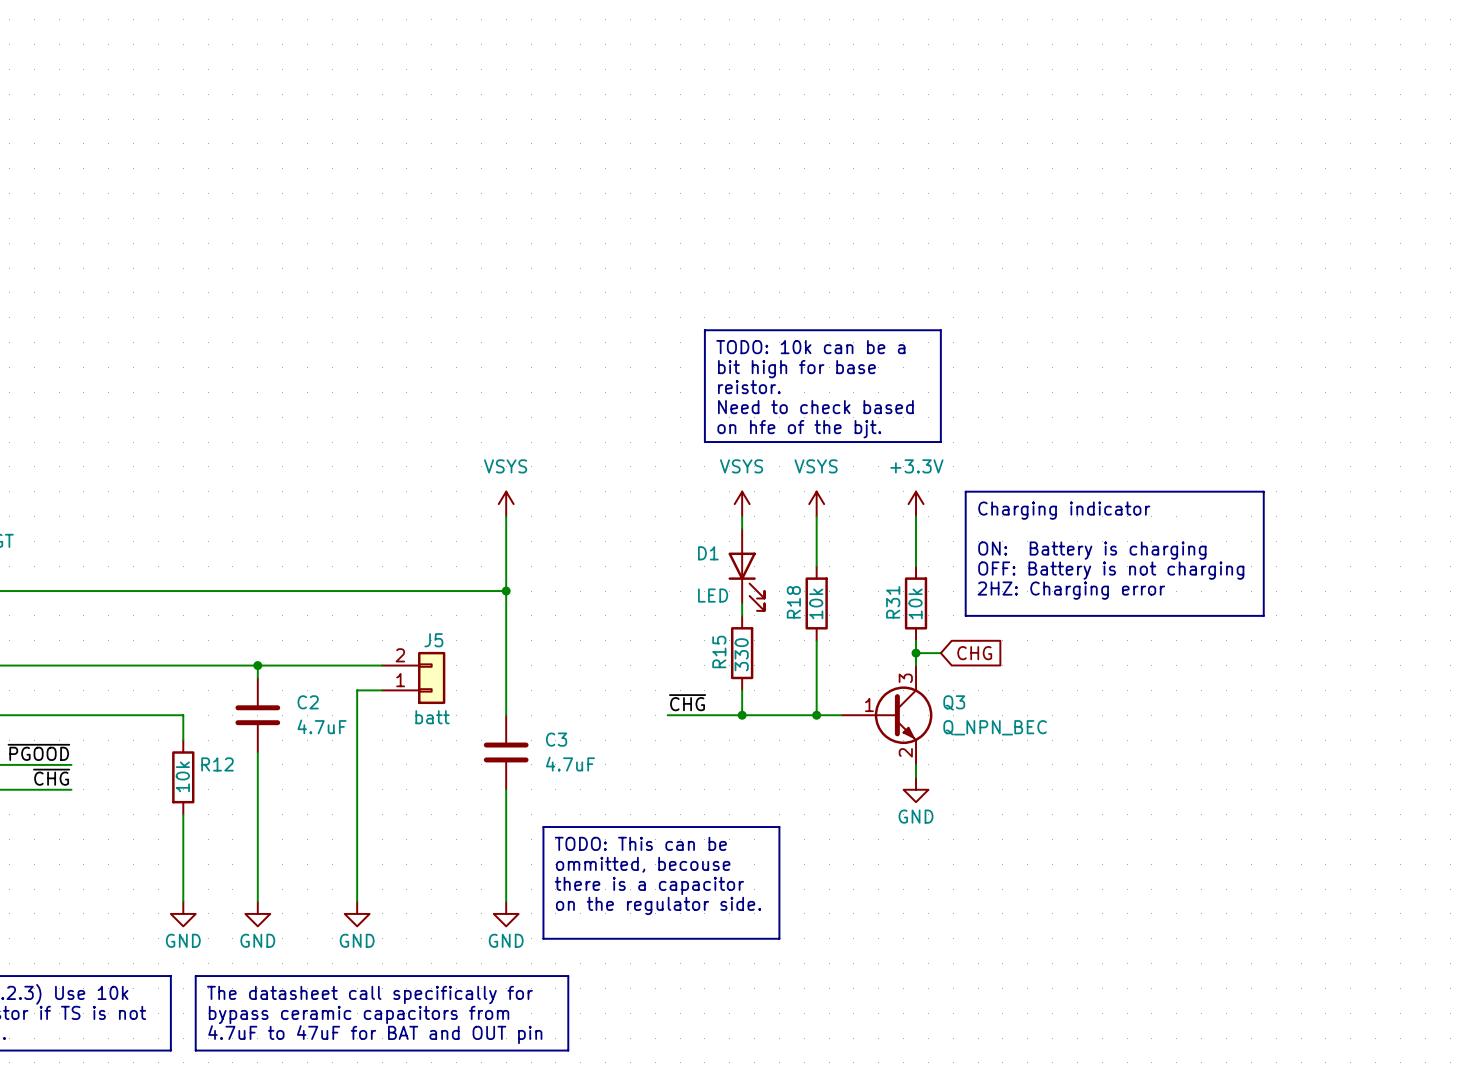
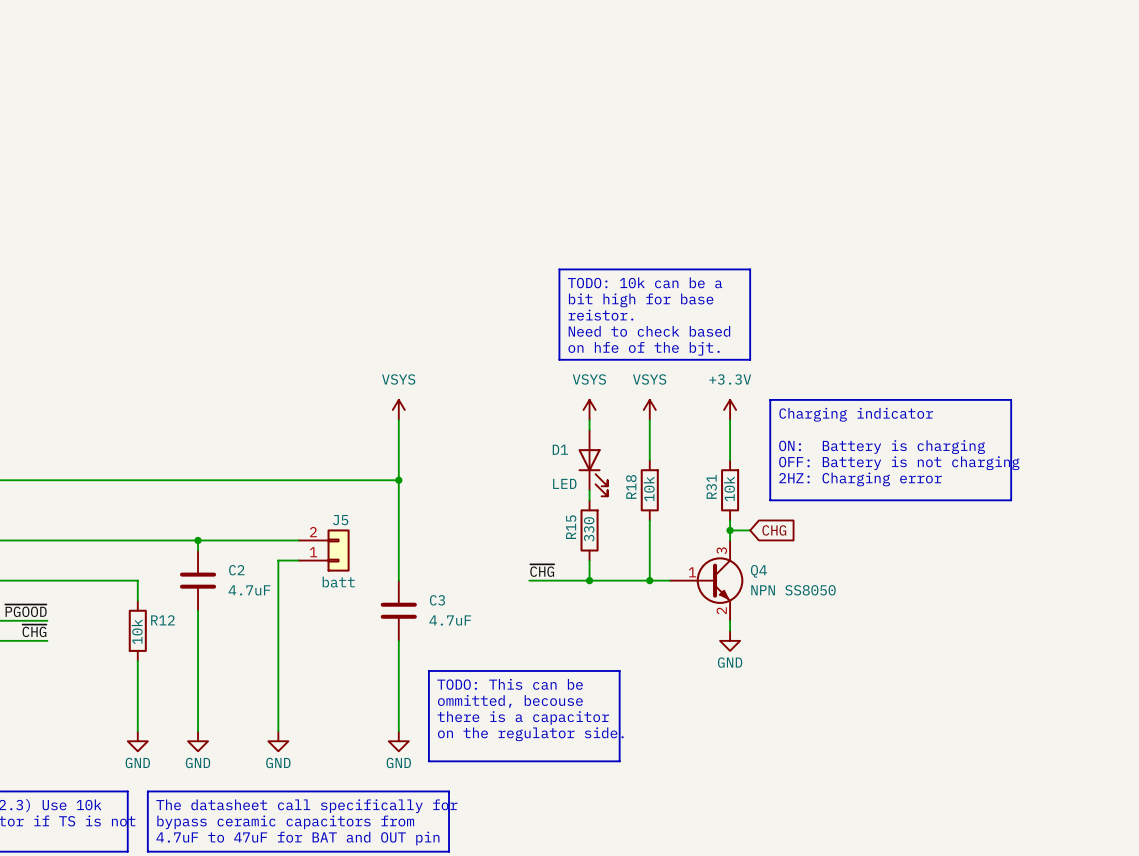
Q3 name: Q3 (954, 702) -> Q4 (758, 571)
Q3 value: Q_NPN_BEC (995, 727) -> NPN SS8050 (793, 590)

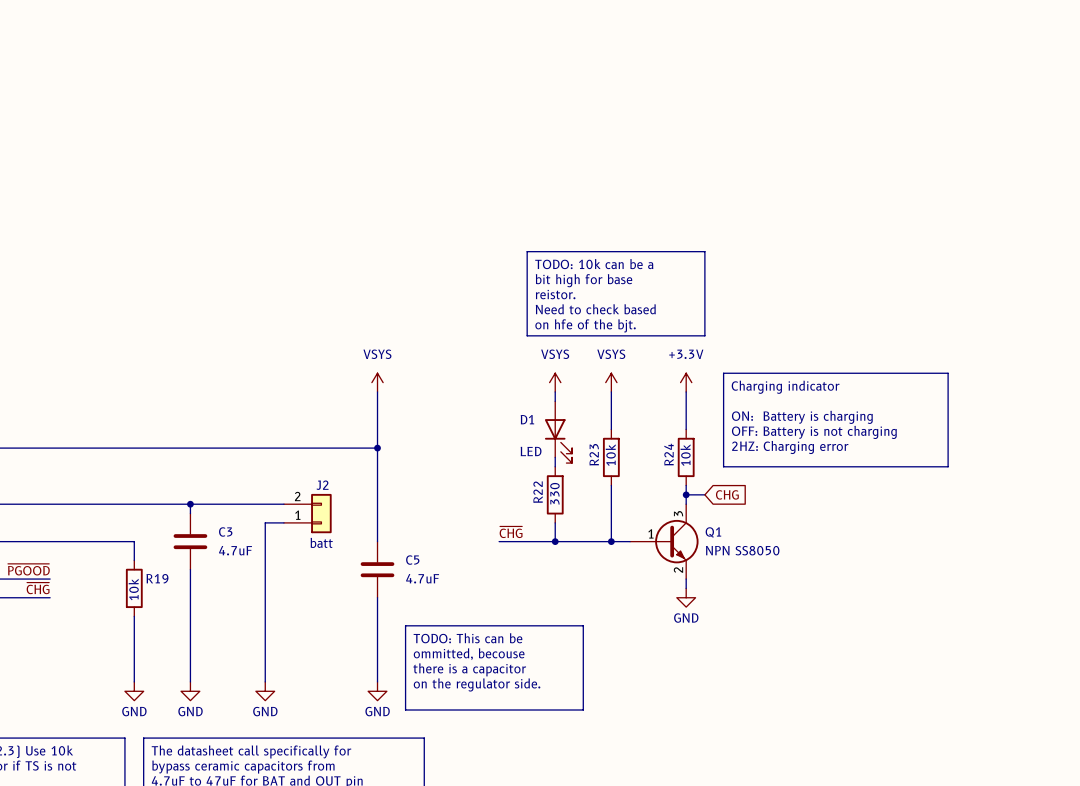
R18 name: R18 (631, 486) -> R23 (594, 454)
R31 name: R31 (711, 486) -> R24 (669, 454)
J5 name: J5 (340, 520) -> J2 (322, 485)
R15 name: R15 (571, 527) -> R22 (538, 492)
C2 name: C2 (236, 570) -> C3 (225, 531)
Q4 name: Q4 (758, 571) -> Q1 (713, 532)
C3 name: C3 (437, 600) -> C5 (412, 560)
R12 name: R12 (162, 620) -> R19 (157, 578)

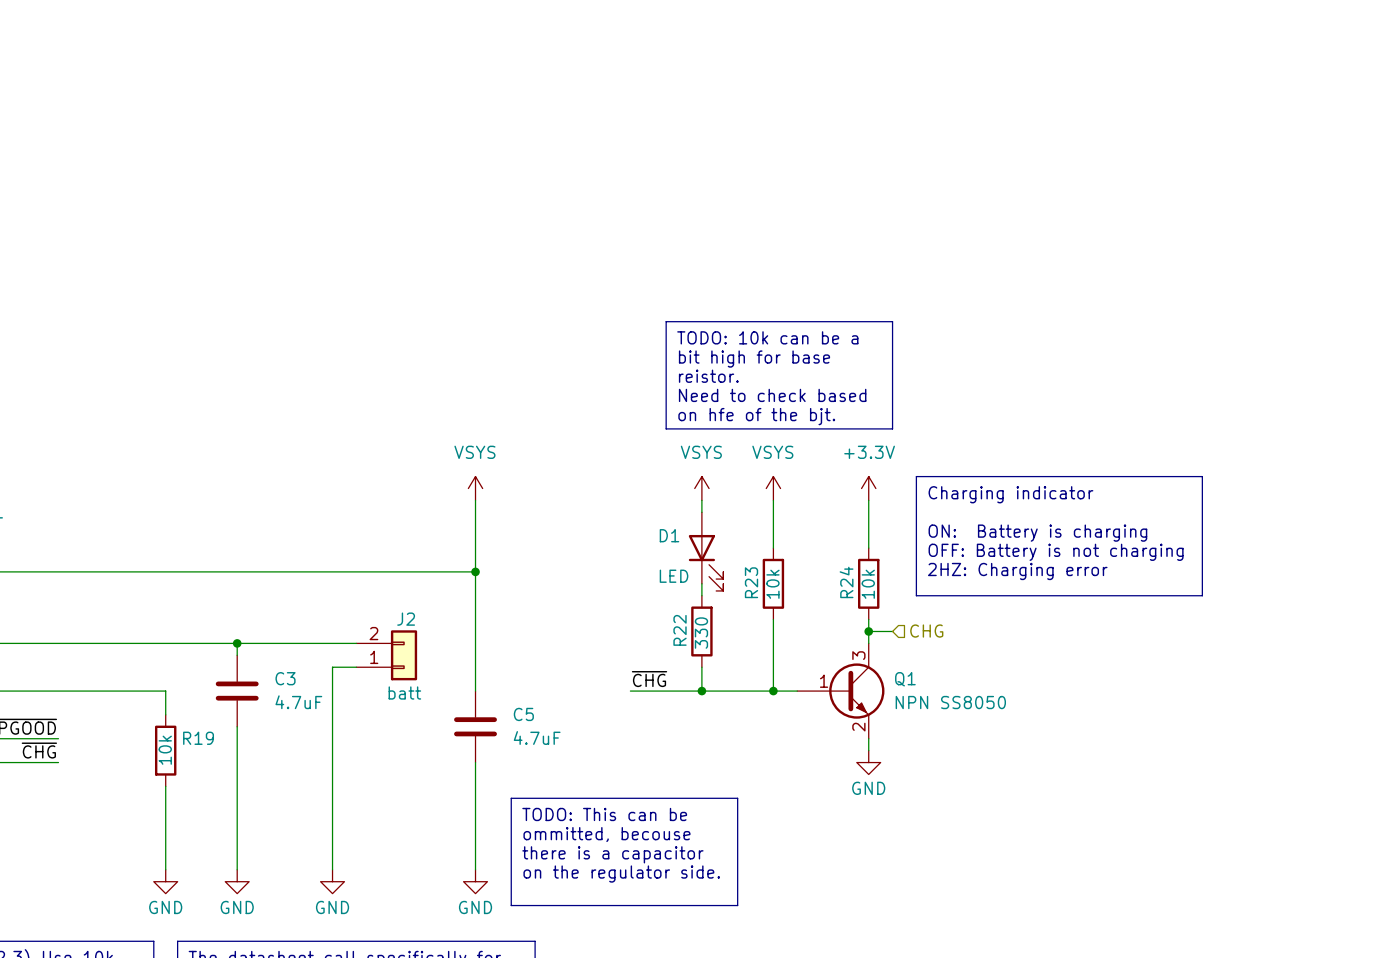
global label: CHG (727, 494) -> none
hierarchical label: none -> CHG (926, 631)

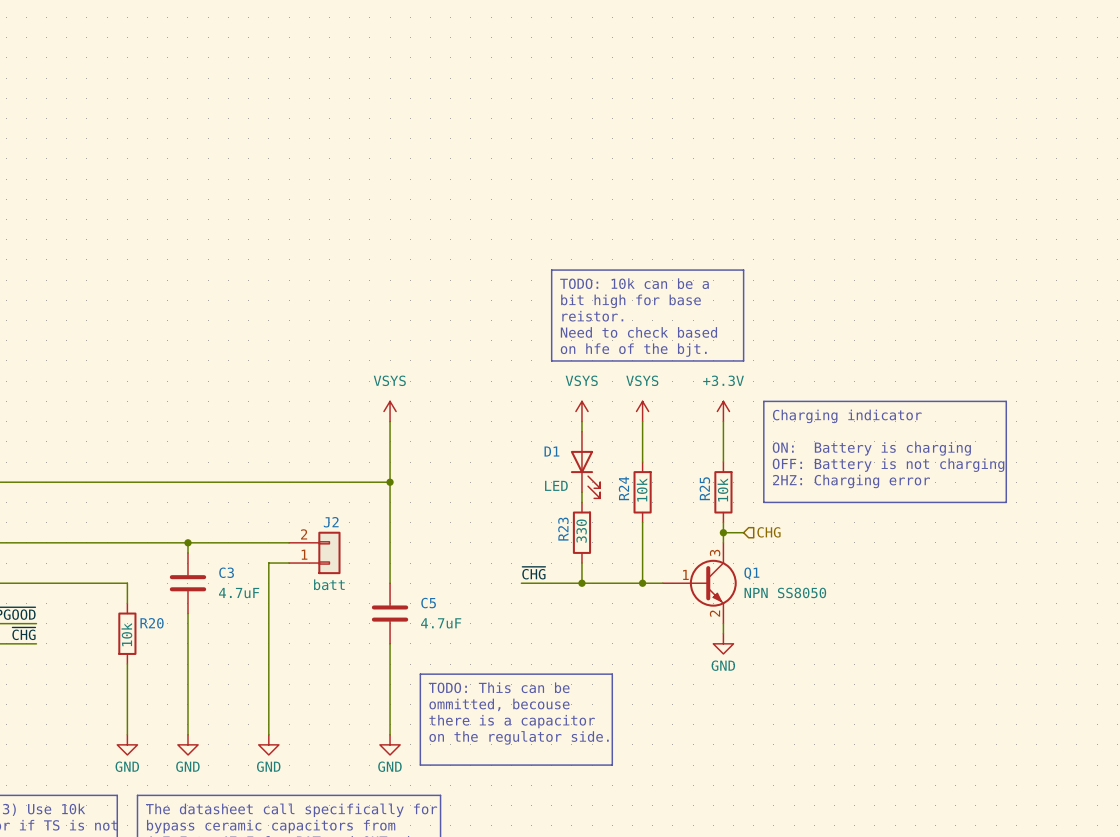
R23 name: R23 (751, 582) -> R24 (623, 488)
R24 name: R24 (846, 582) -> R25 (704, 488)
R22 name: R22 (680, 630) -> R23 (563, 529)
R19 name: R19 (198, 738) -> R20 (152, 623)

